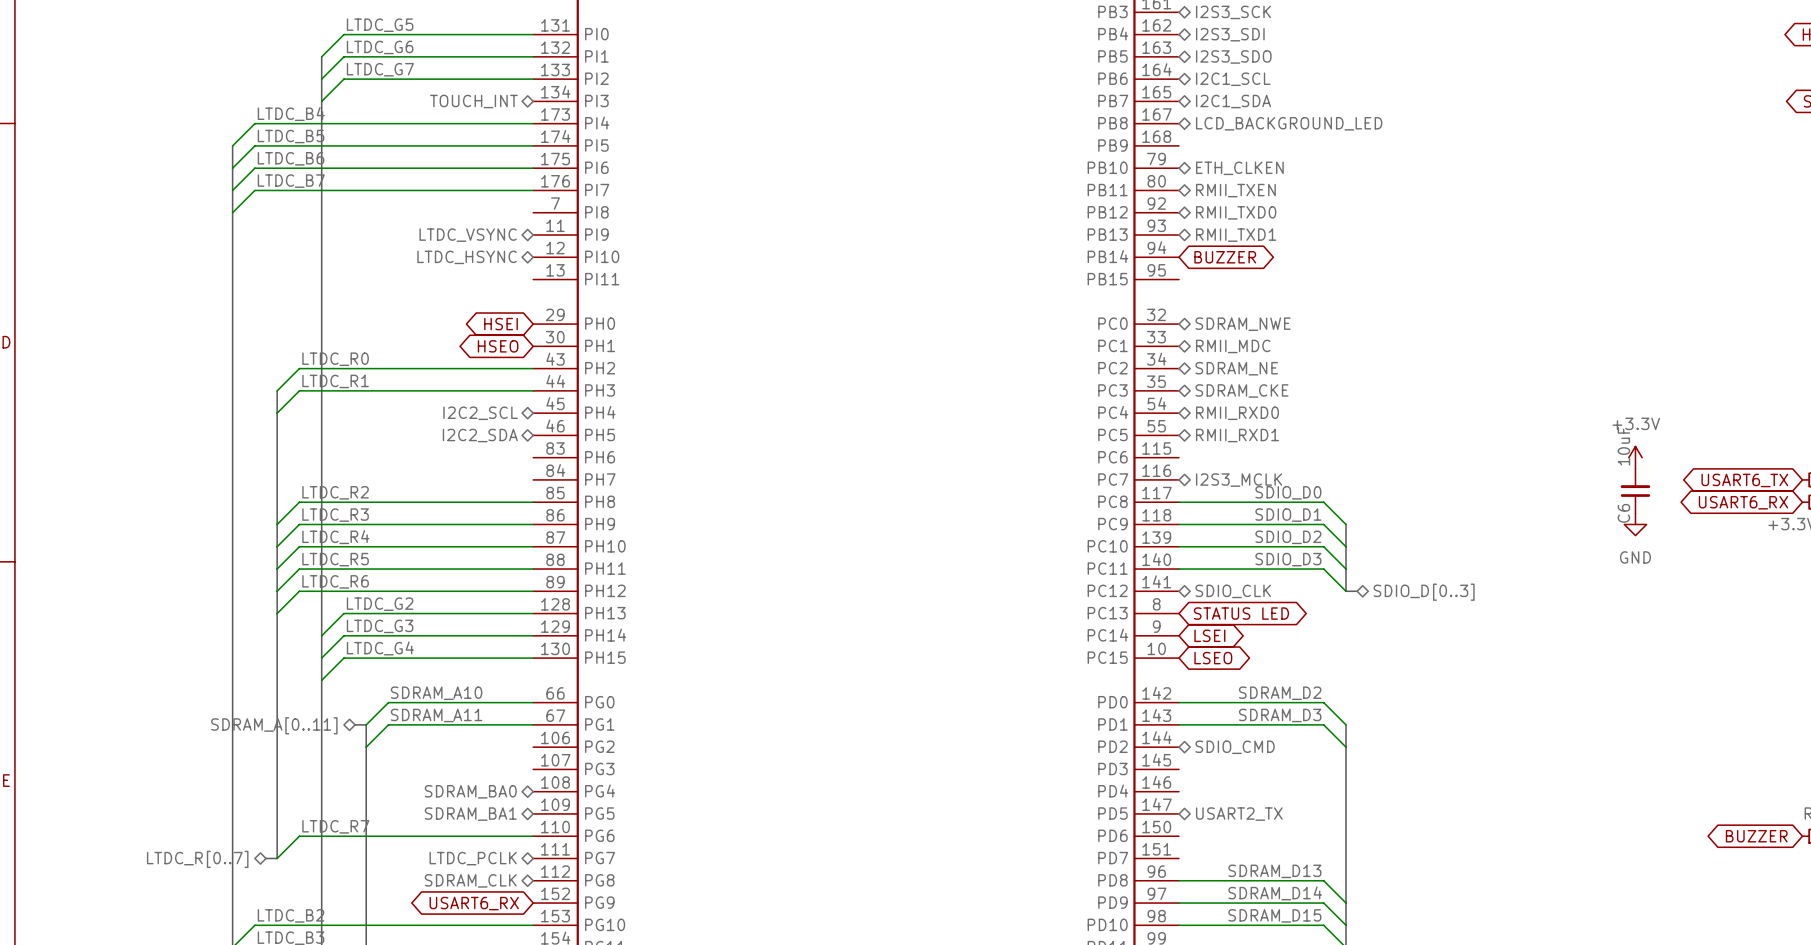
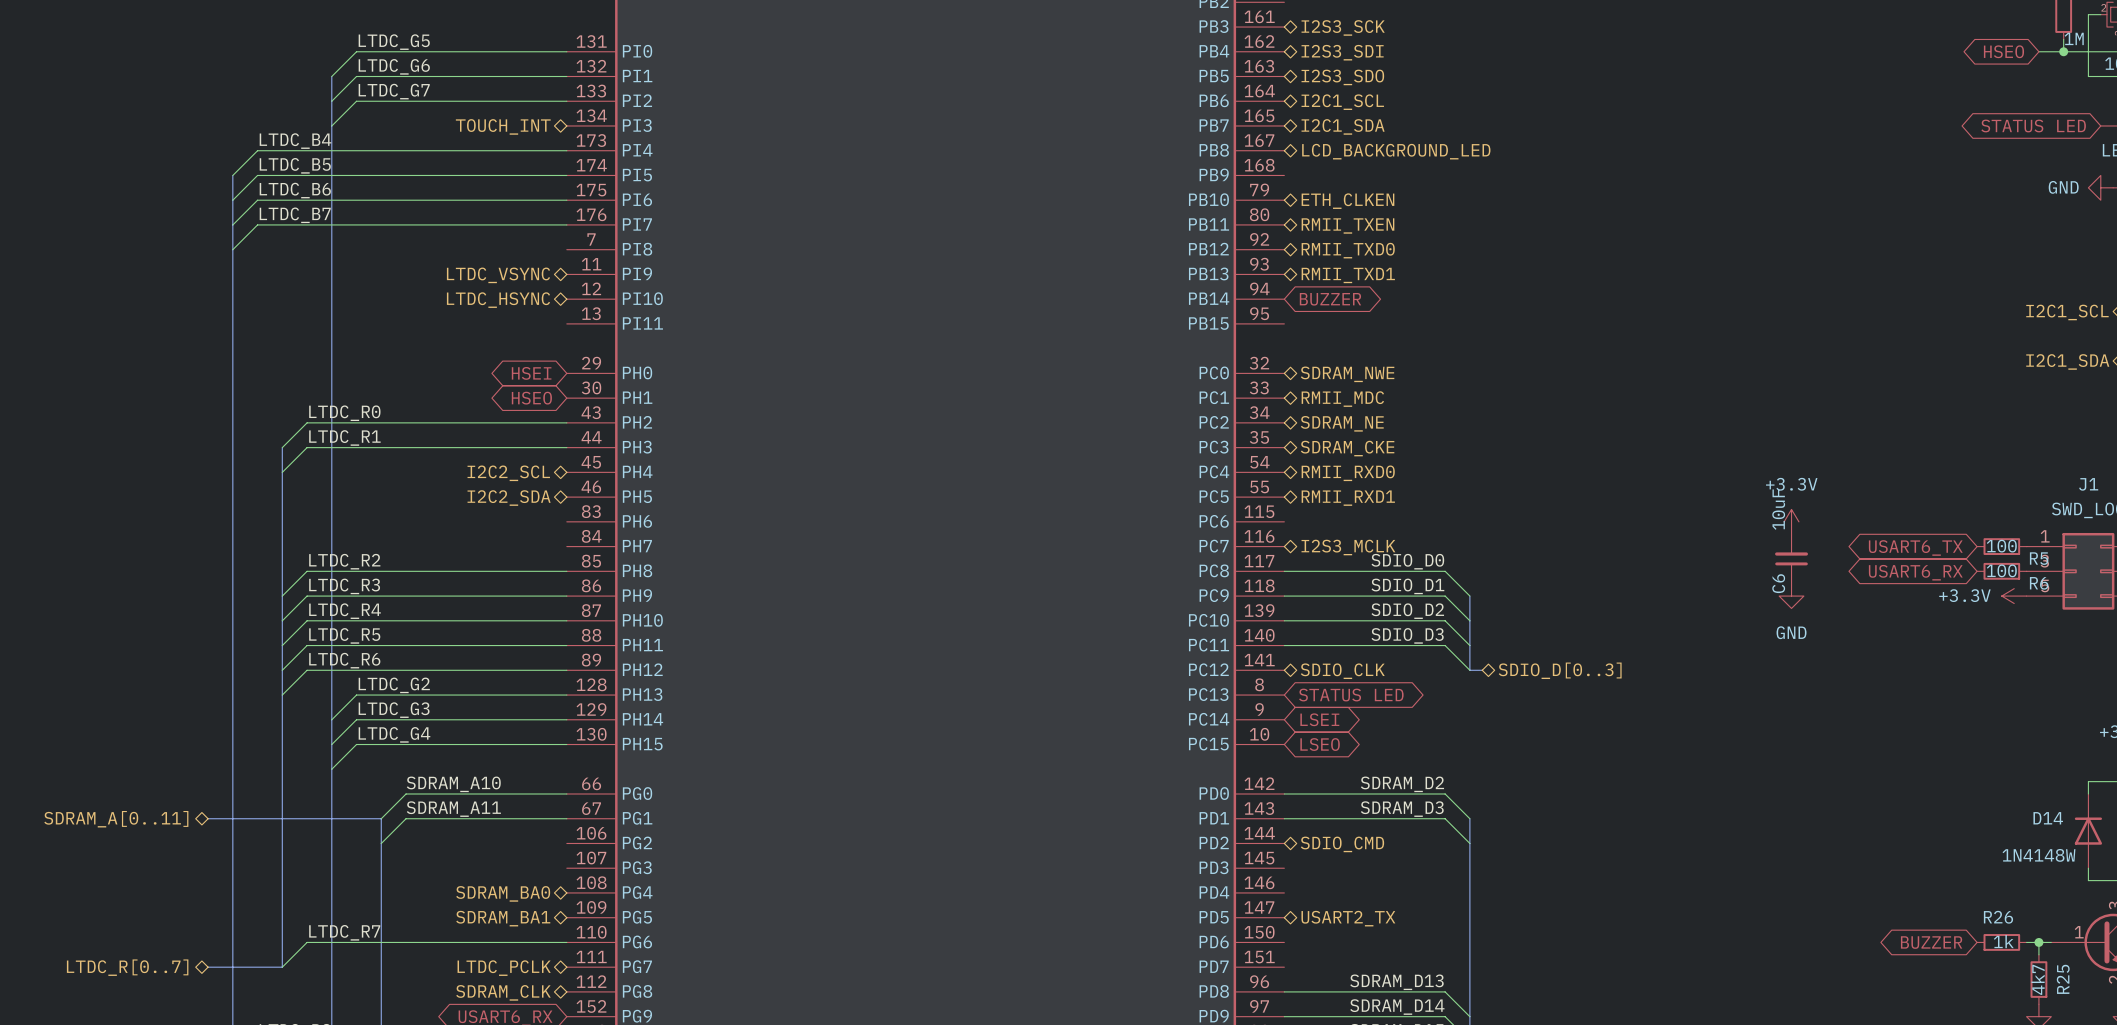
bus: none -> (208, 818) (368, 818)
hierarchical label position: SDRAM_A[0..11] (274, 725) -> SDRAM_A[0..11] (116, 819)
bus: none -> (208, 967) (269, 967)
hierarchical label position: LTDC_R[0..7] (197, 859) -> LTDC_R[0..7] (127, 967)

